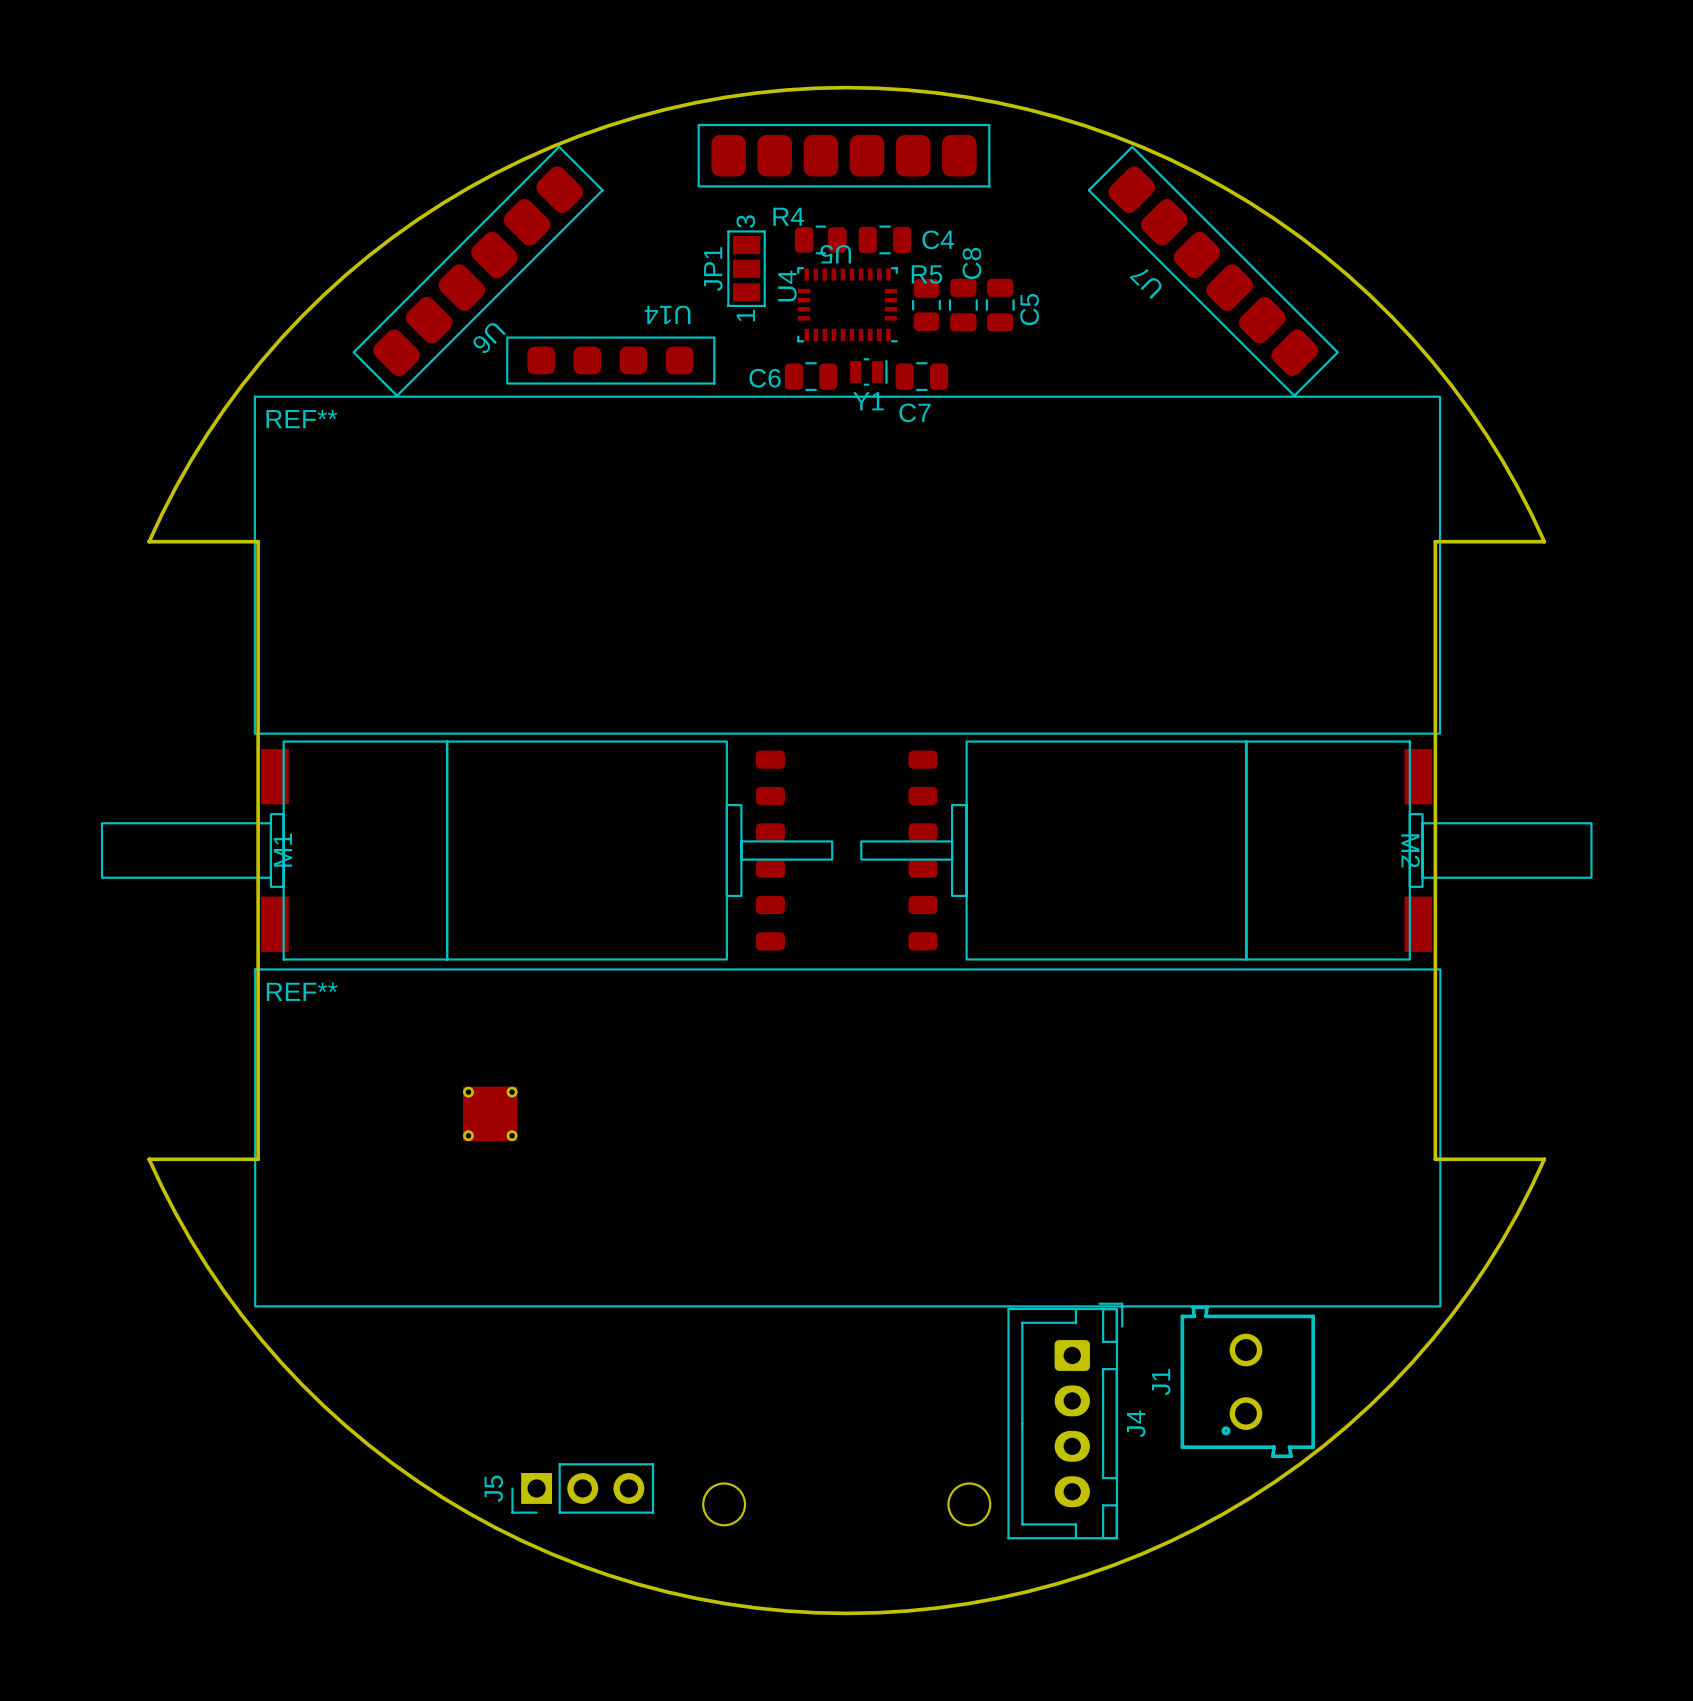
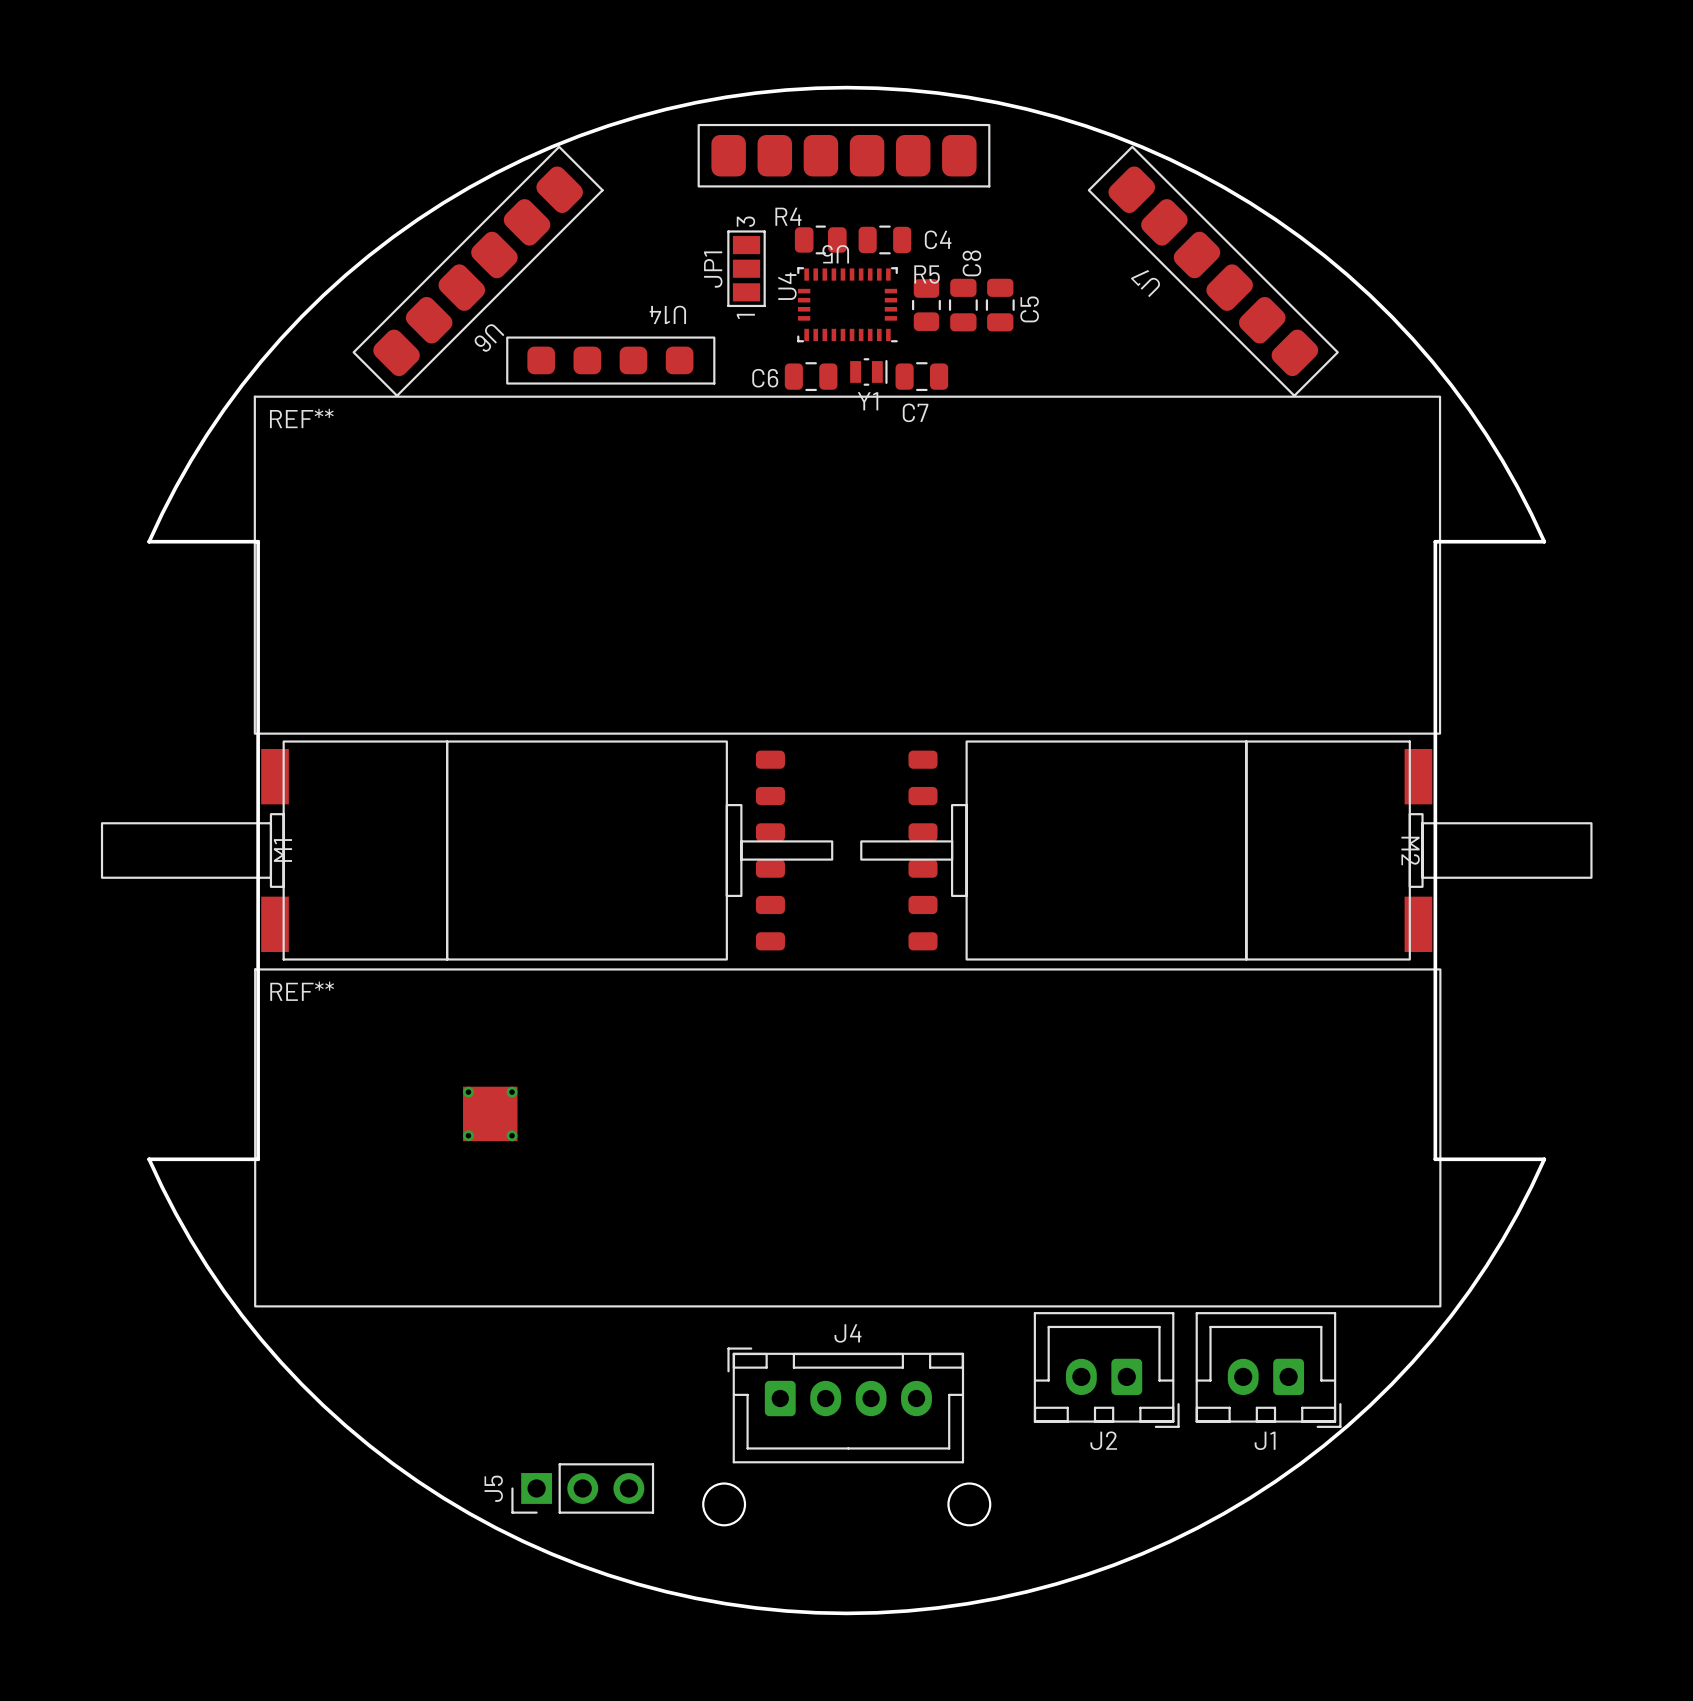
J1 footprint: [1180, 1305, 1315, 1459] -> [1195, 1312, 1342, 1428]
J2: none -> (1106, 1370)
J1 name position: J1 (1161, 1382) -> J1 (1265, 1440)
J4 rotation: 0° (1065, 1420) -> 90° counterclockwise (845, 1405)
J4 position: (1065, 1420) -> (845, 1405)

